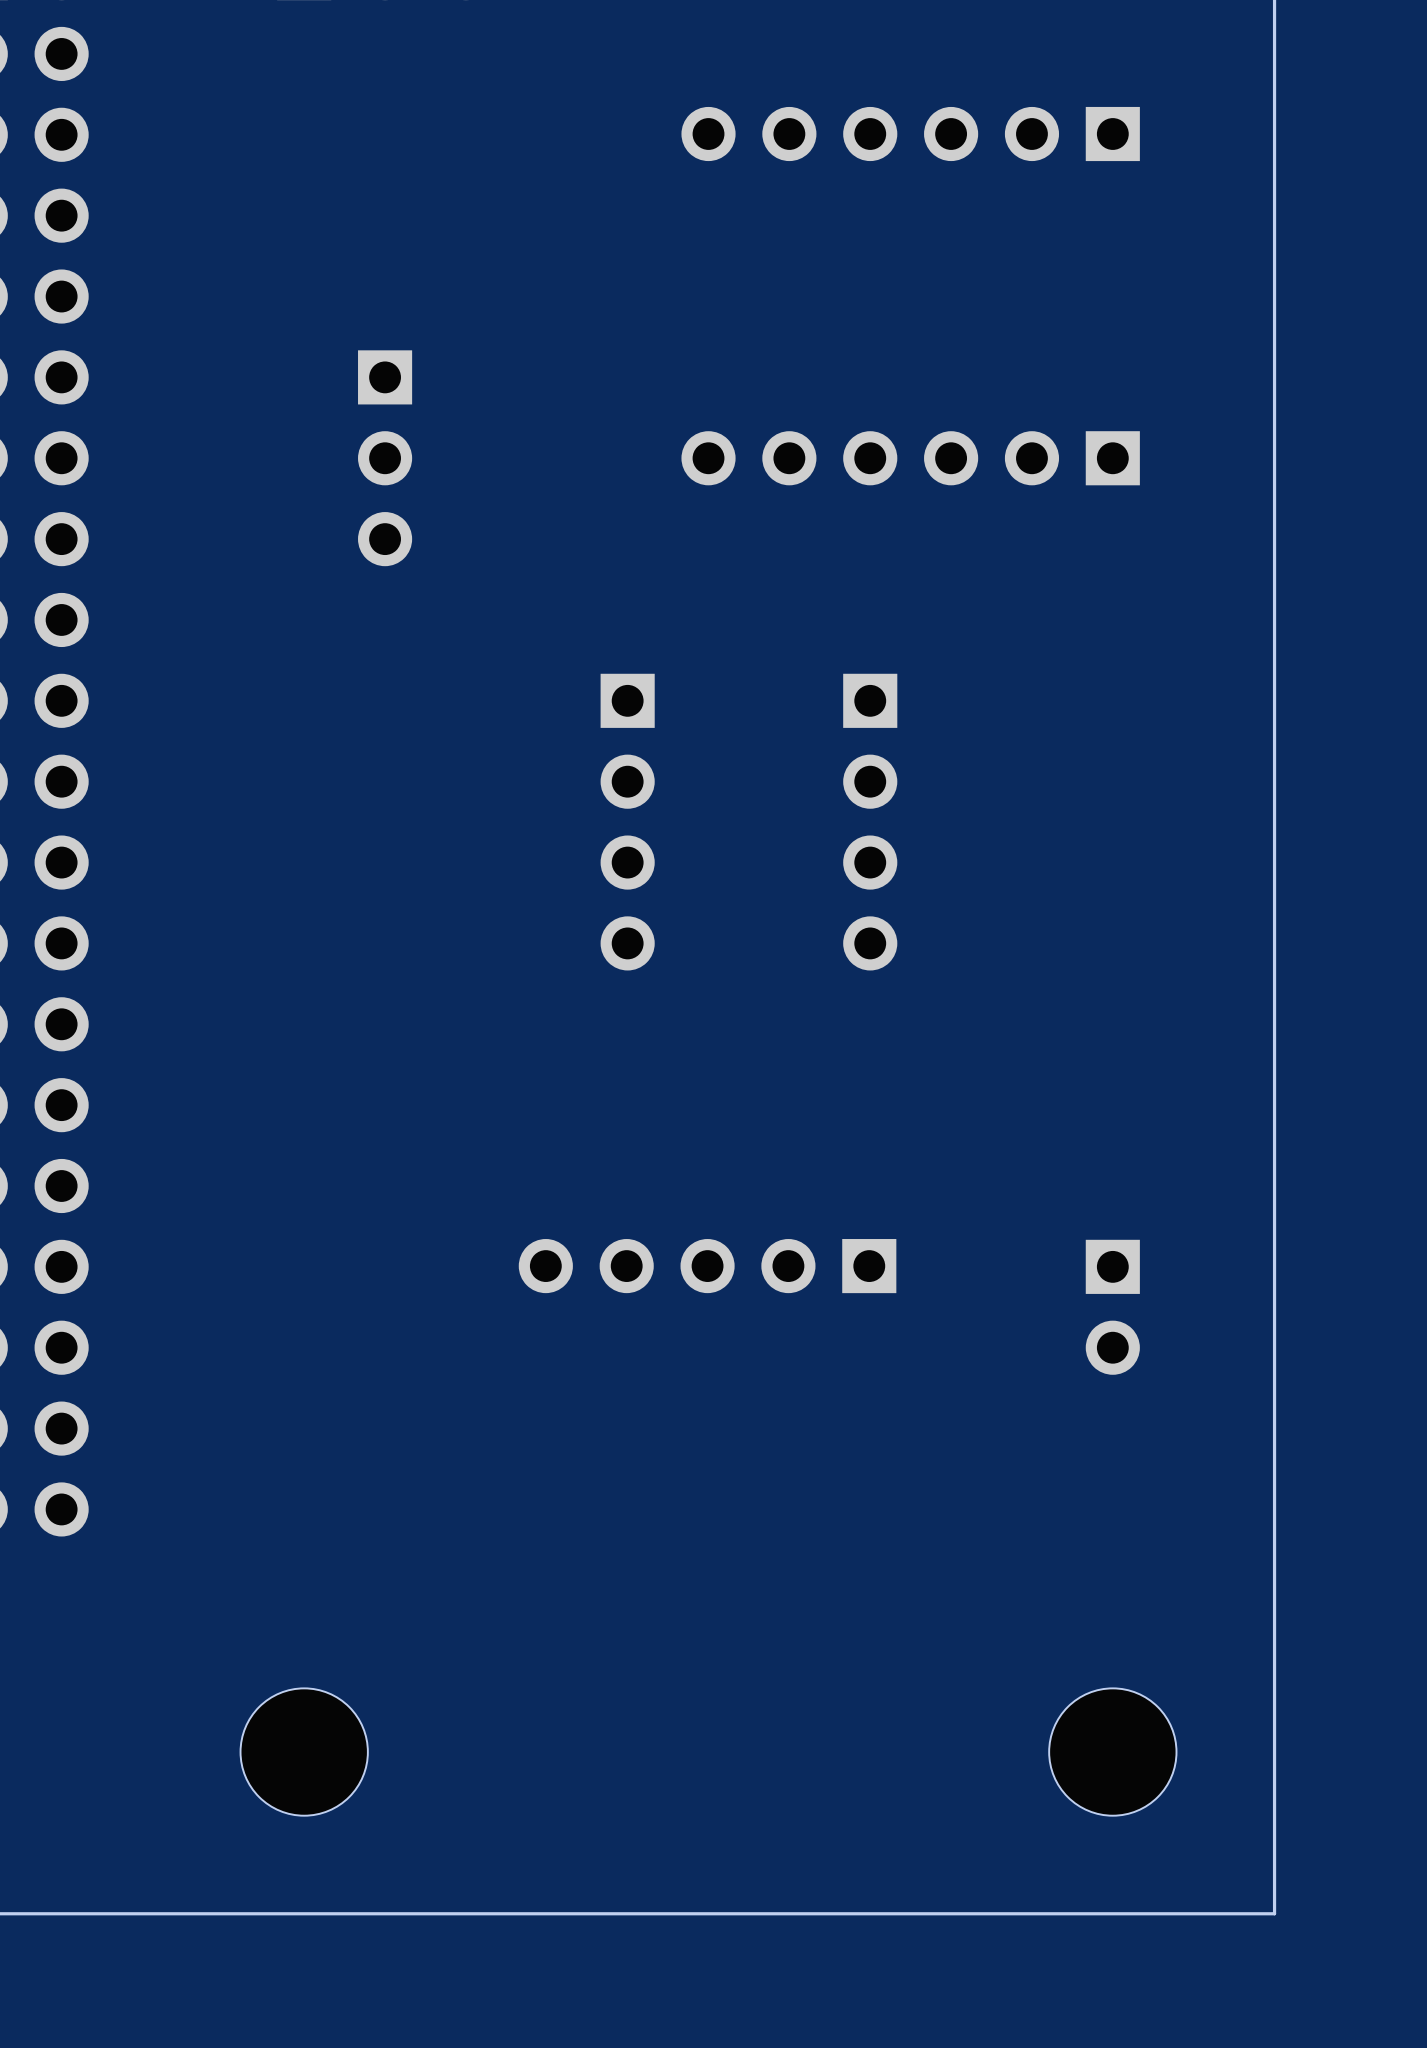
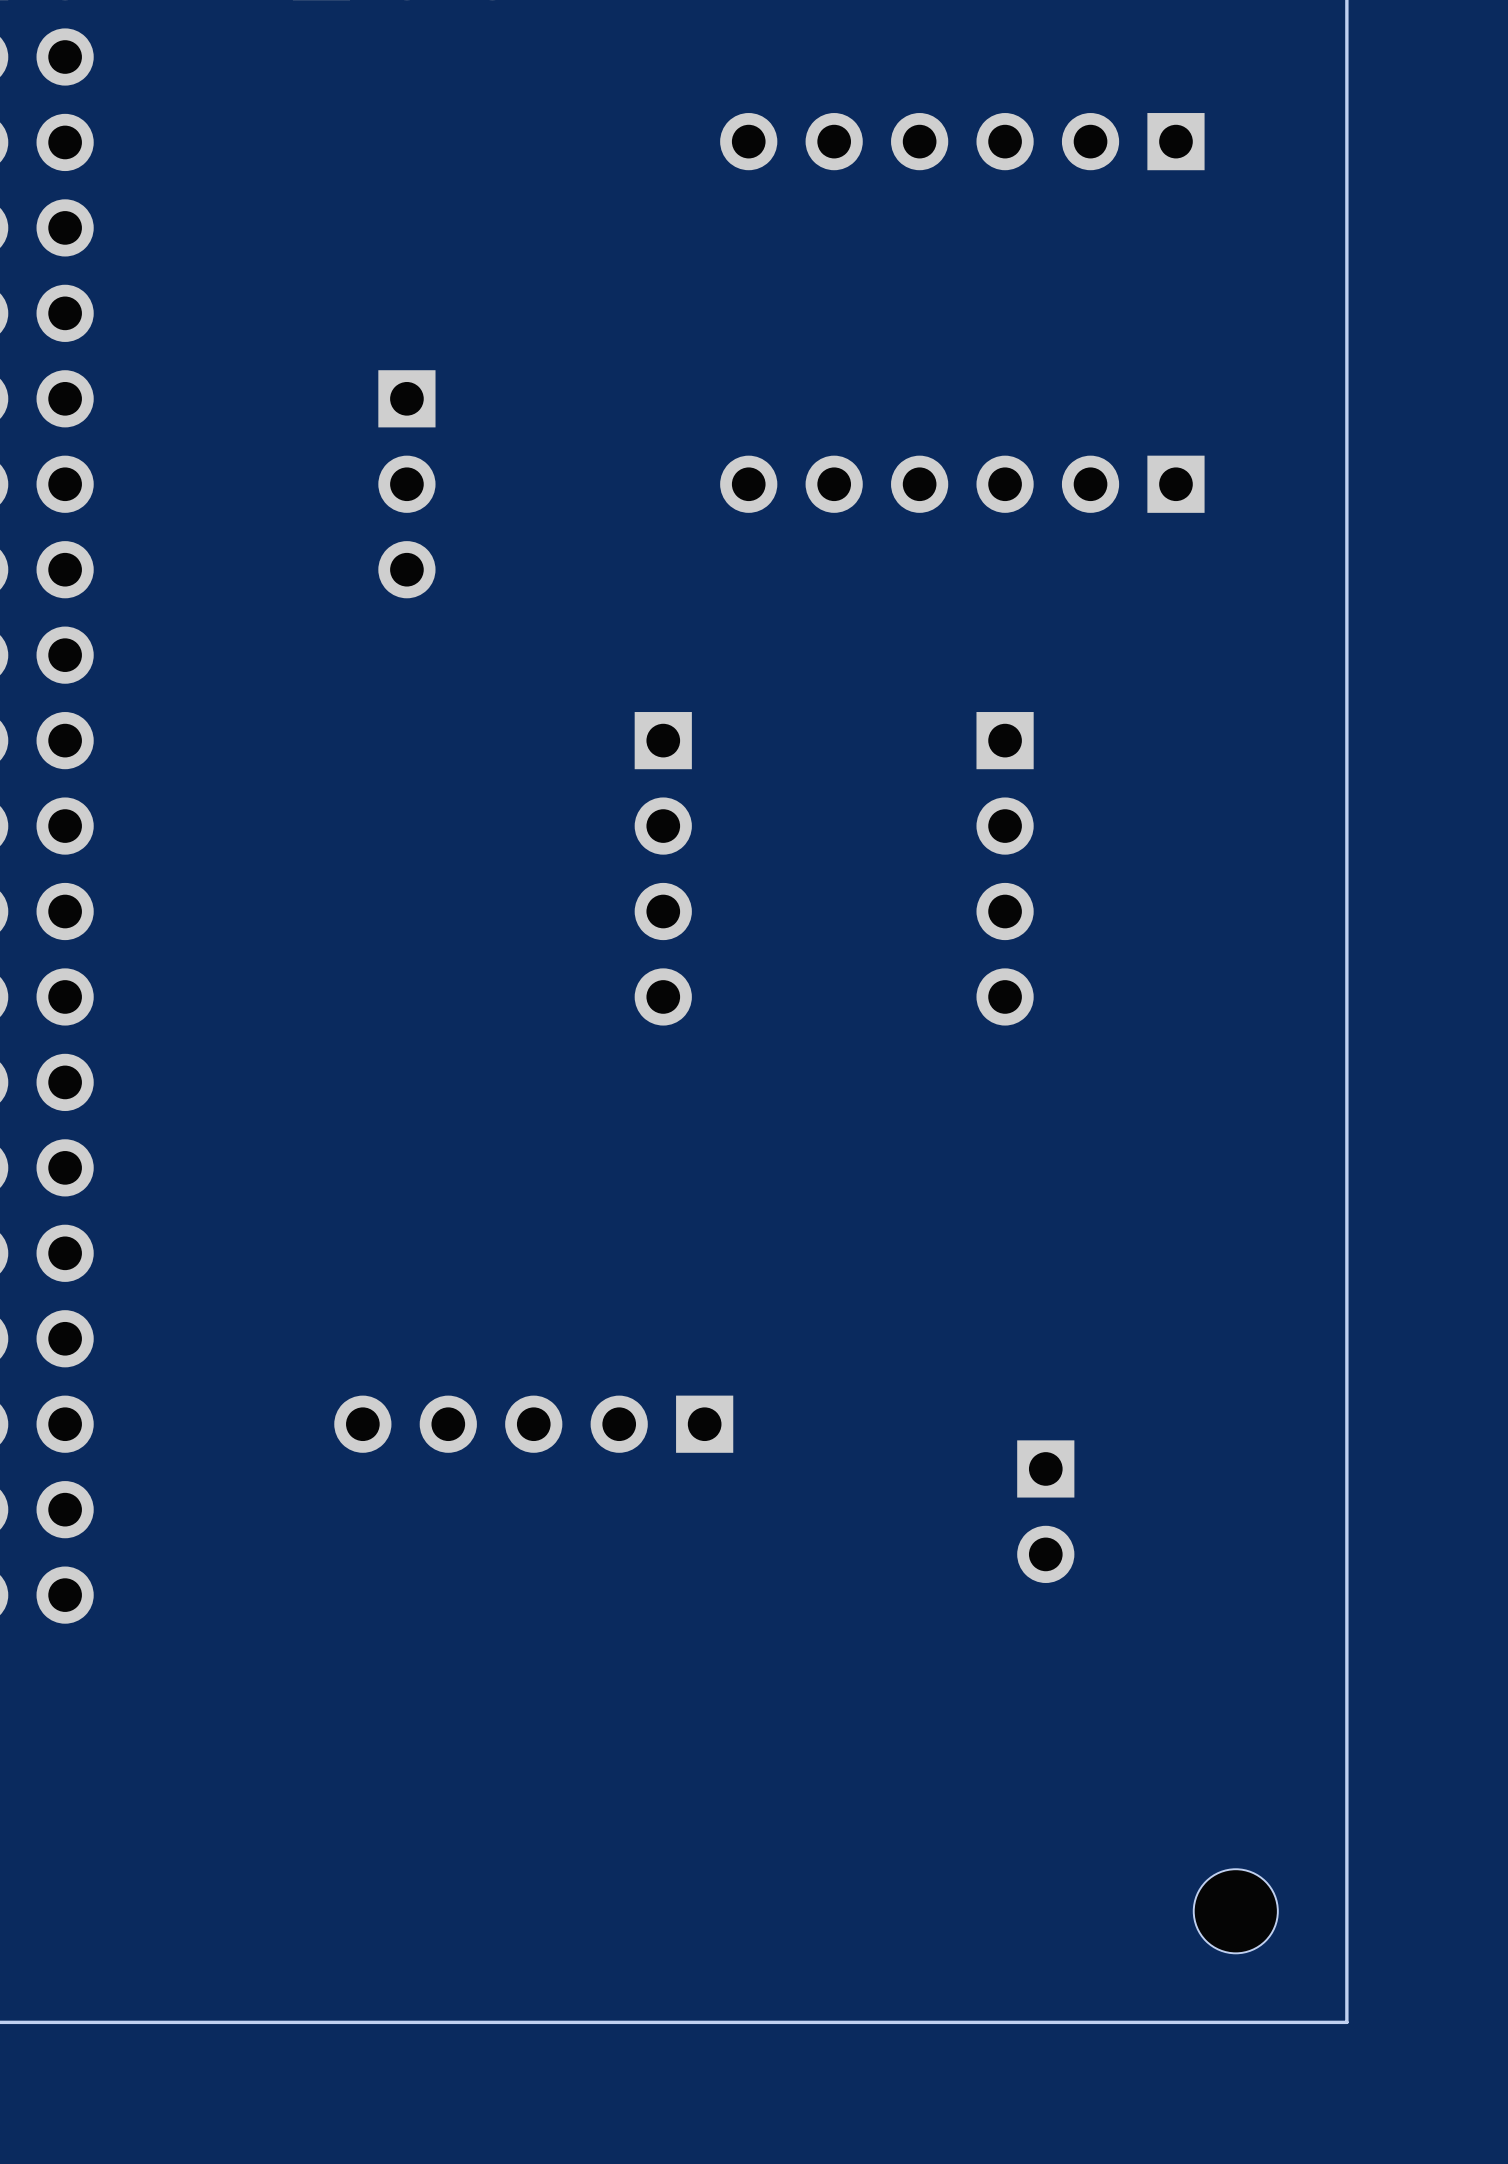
part position: (870, 822) -> (1005, 868)
part position: (707, 1266) -> (533, 1424)
part position: (1112, 1307) -> (1045, 1511)
part: (304, 1752) -> none
part: (1112, 1752) -> none
part: none -> (1235, 1911)

